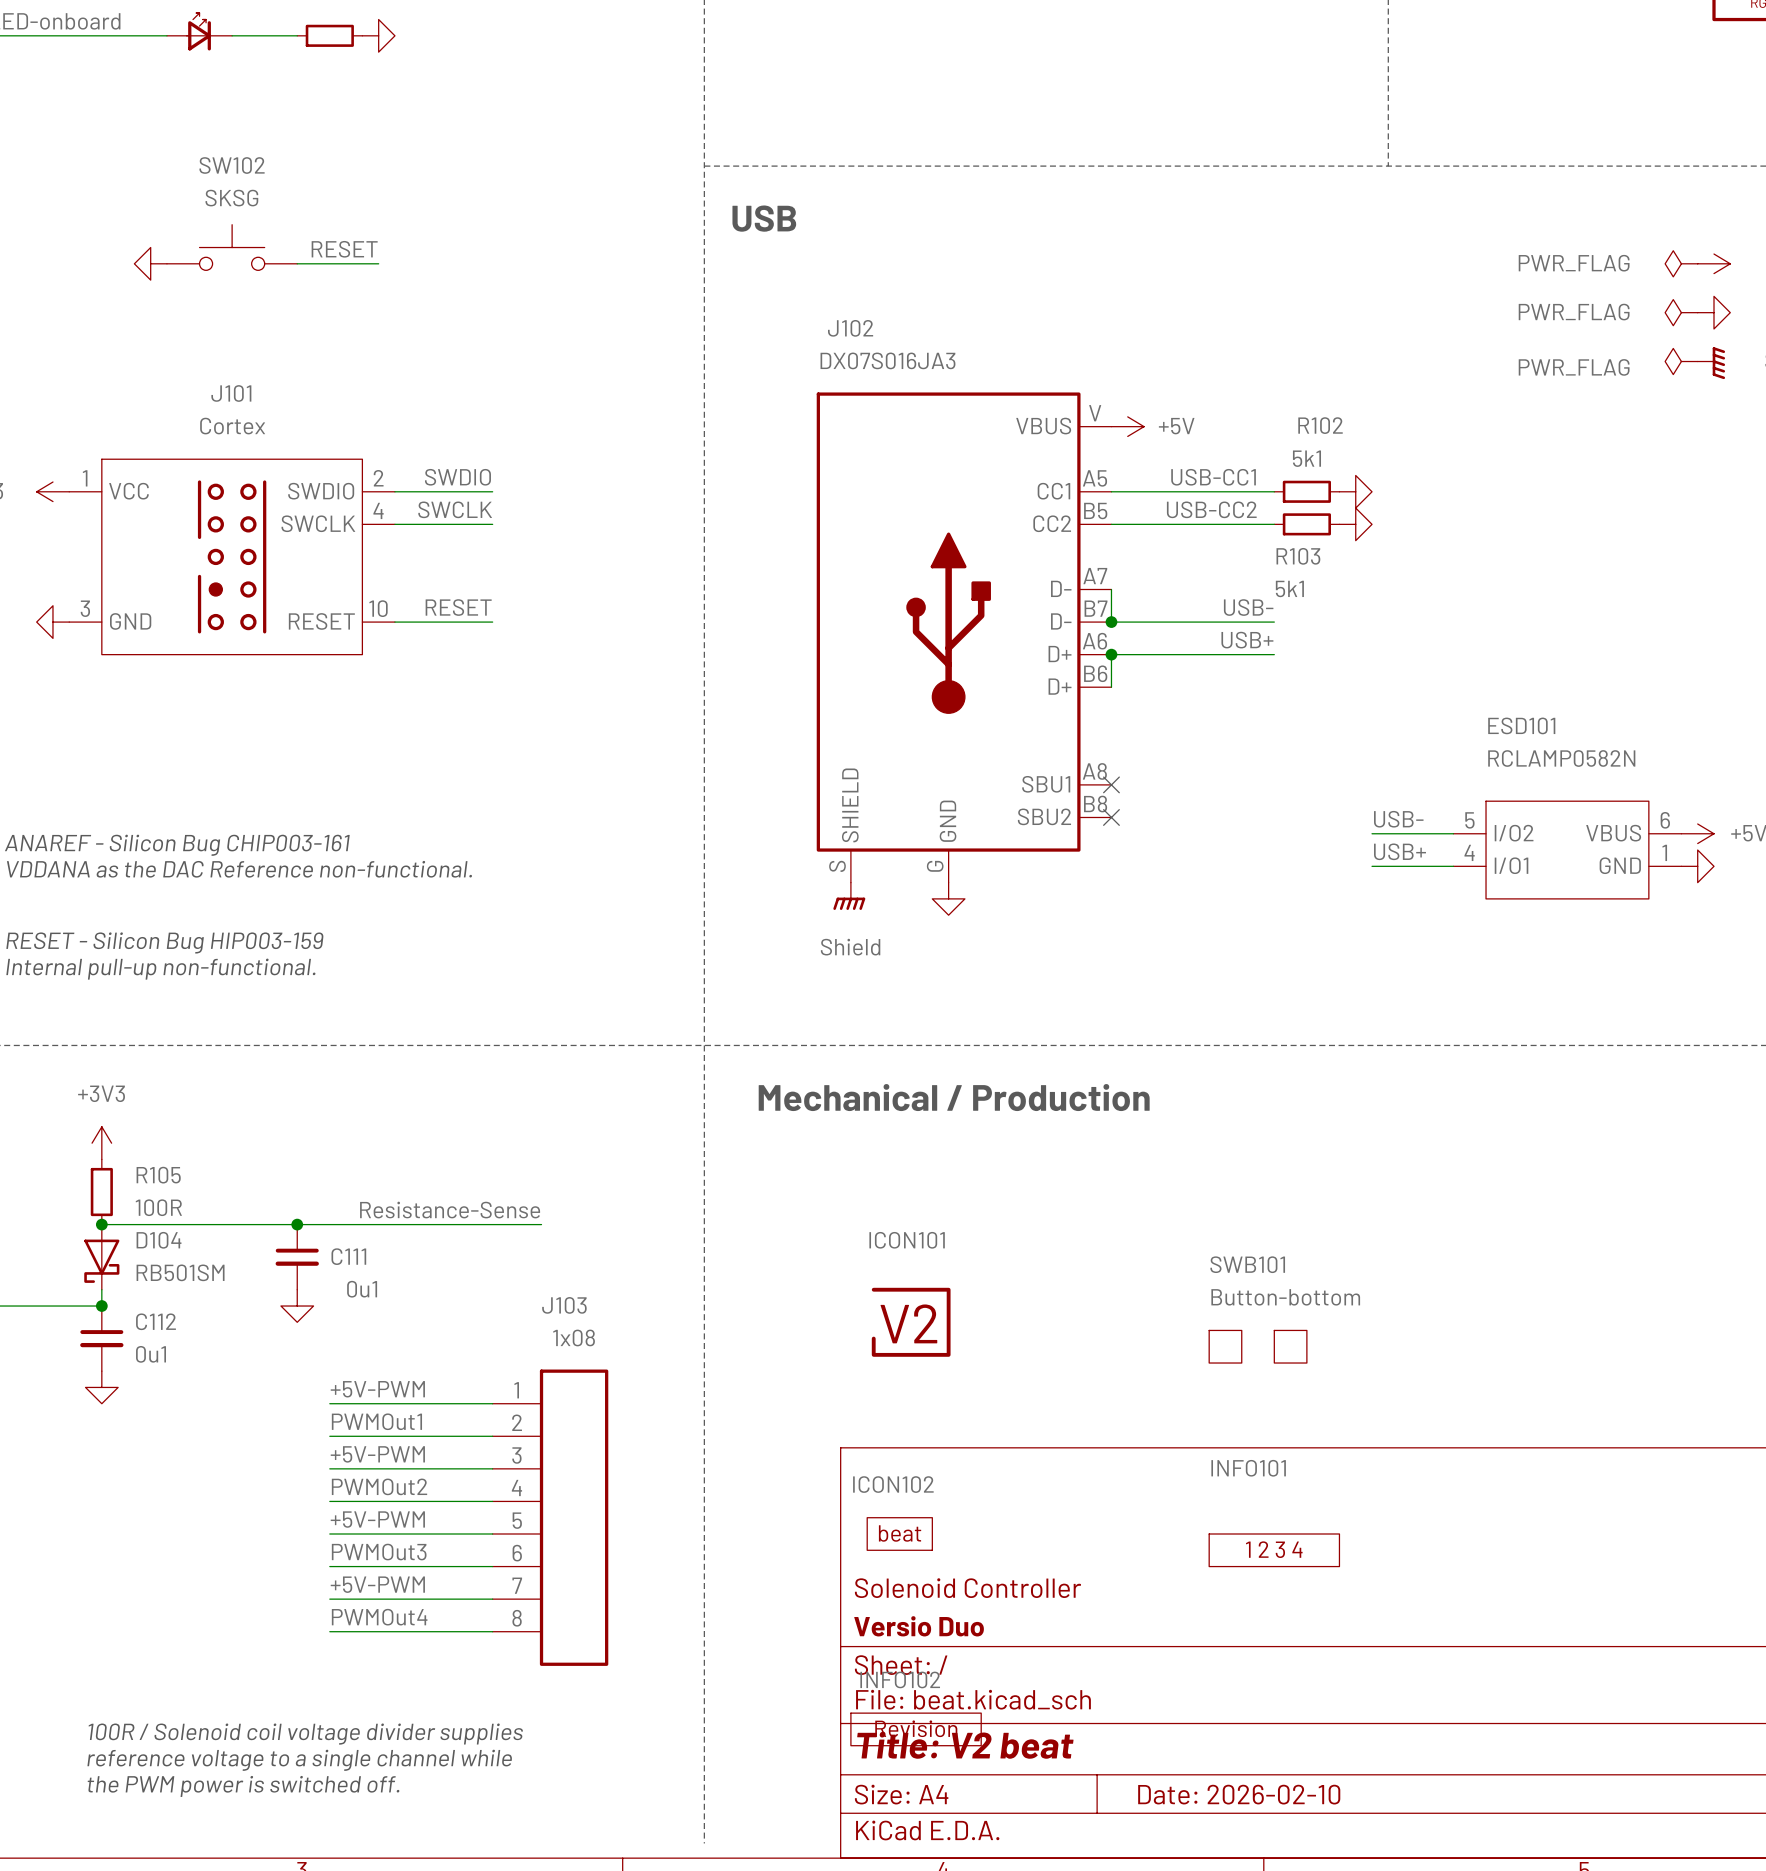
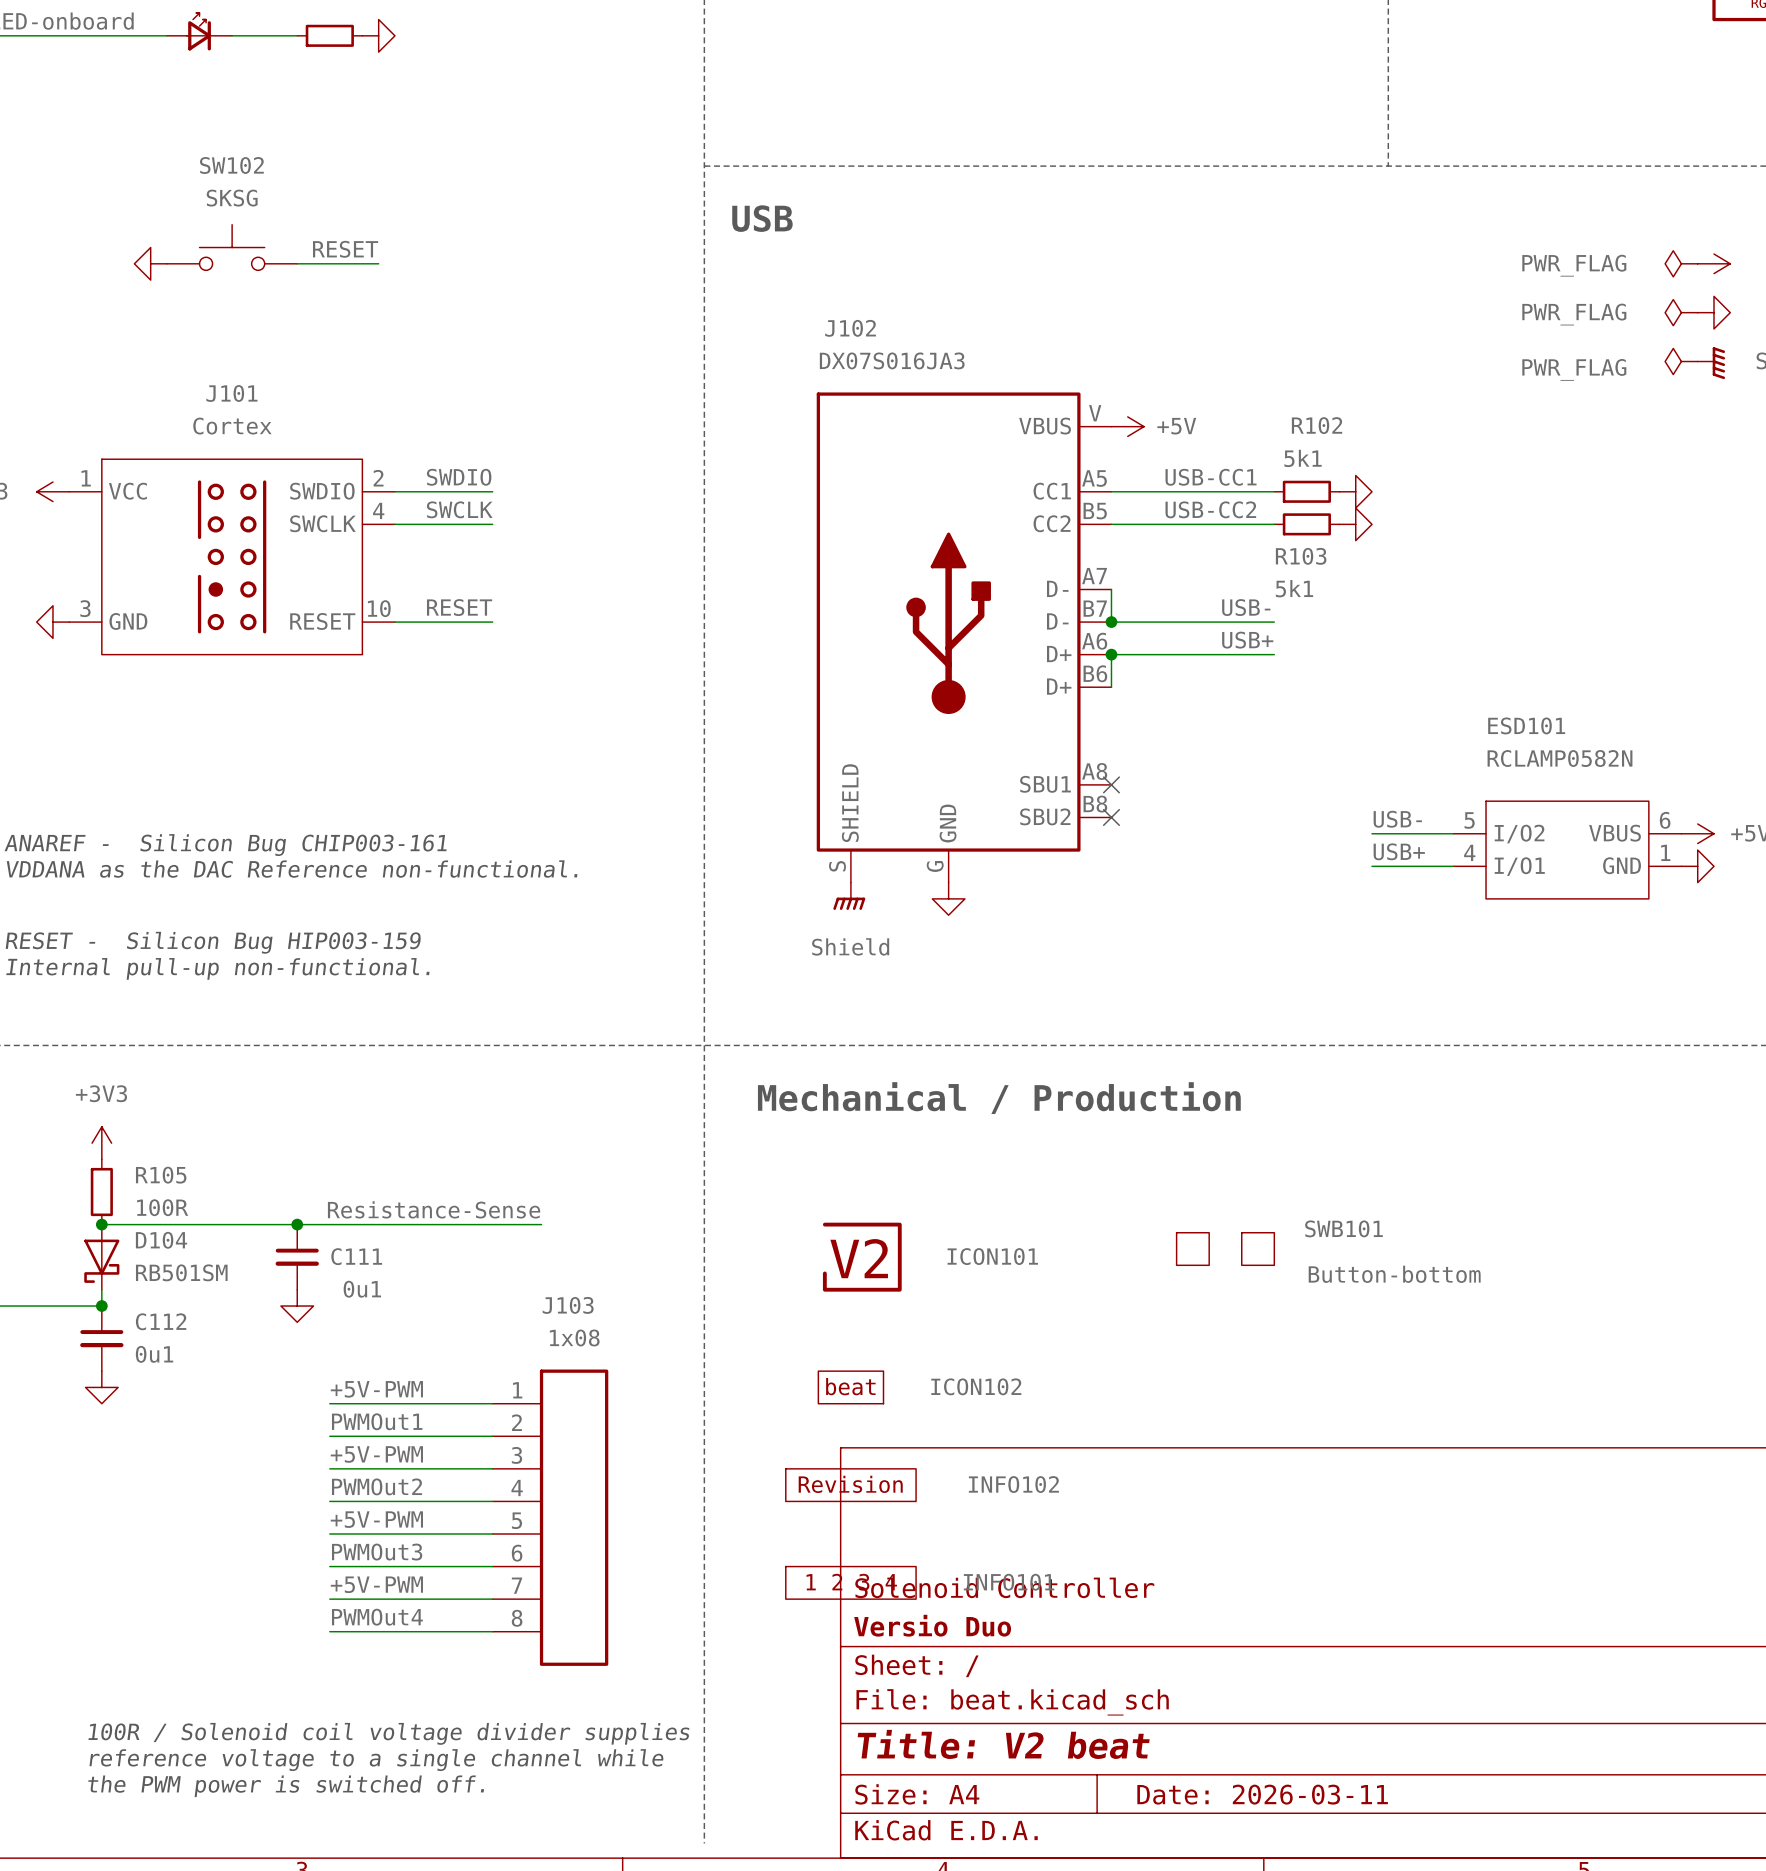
ICON101 name position: ICON101 (907, 1240) -> ICON101 (992, 1256)
SWB101 name position: SWB101 (1247, 1264) -> SWB101 (1343, 1228)
SWB101 value position: Button-bottom (1285, 1297) -> Button-bottom (1394, 1274)
ICON101 position: (911, 1322) -> (862, 1257)
SWB101 position: (1258, 1346) -> (1225, 1249)
INFO101 name position: INFO101 (1248, 1468) -> INFO101 (1009, 1582)
ICON102 name position: ICON102 (893, 1484) -> ICON102 (976, 1386)
ICON102 position: (842, 1493) -> (793, 1346)
INFO101 position: (1274, 1550) -> (850, 1582)
INFO102 name position: INFO102 (900, 1679) -> INFO102 (1013, 1484)
INFO102 position: (916, 1729) -> (850, 1485)
title block: Date: 2026-02-10 (1239, 1794) -> Date: 2026-03-11 (1262, 1794)

